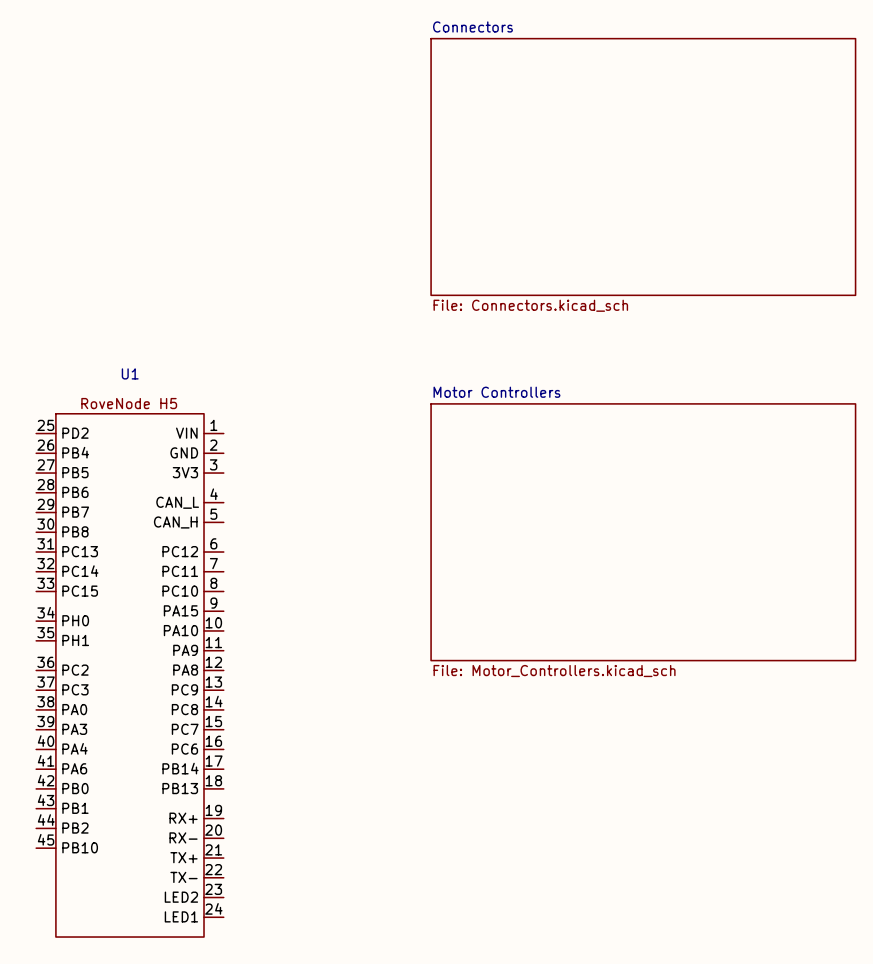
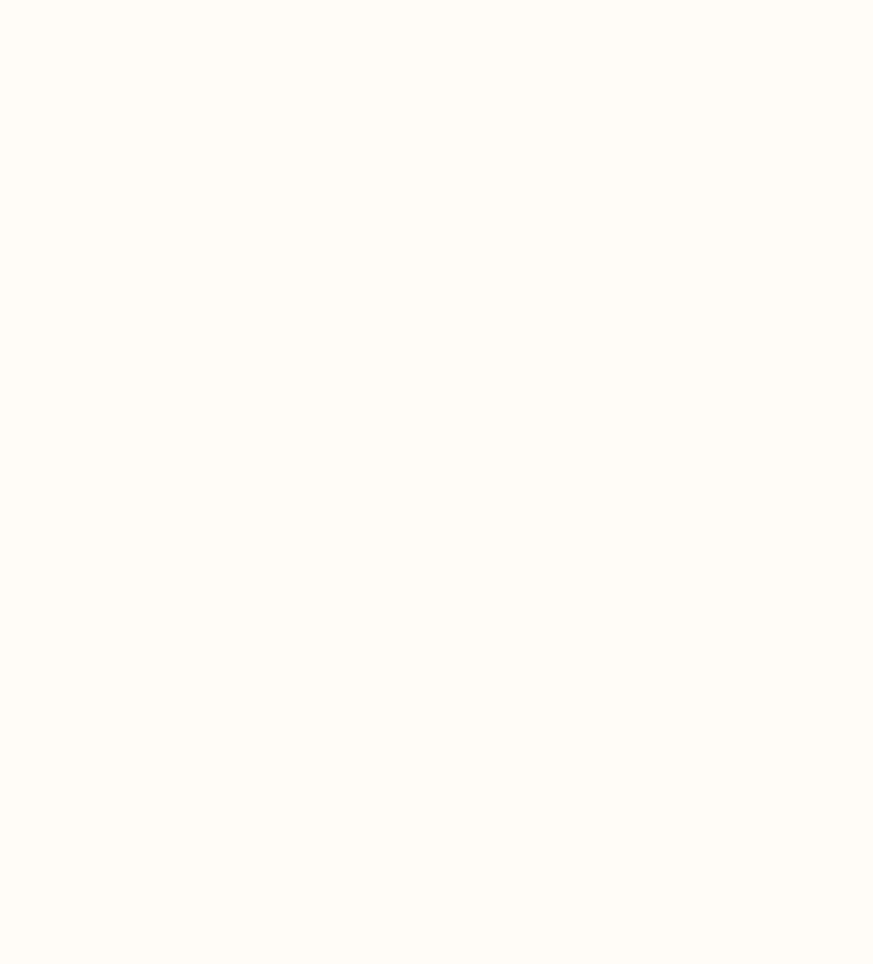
sheet Connectors: File: Connectors.kicad_sch (643, 166) -> none
sheet Motor Controllers: File: Motor_Controllers.kicad_sch (643, 532) -> none
U1: (129, 675) -> none

